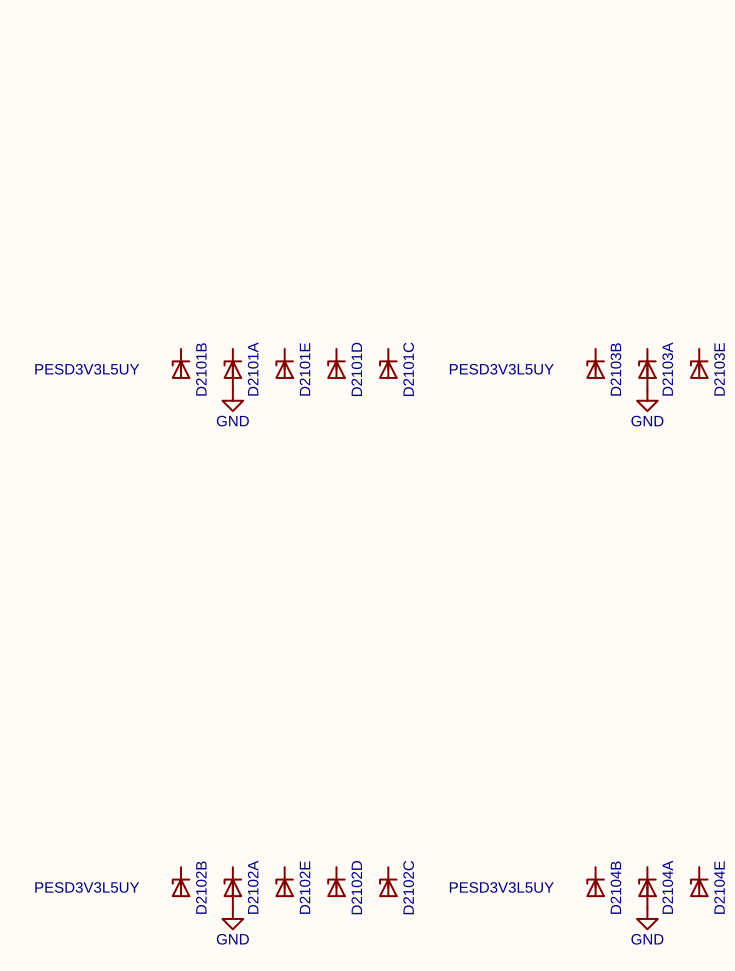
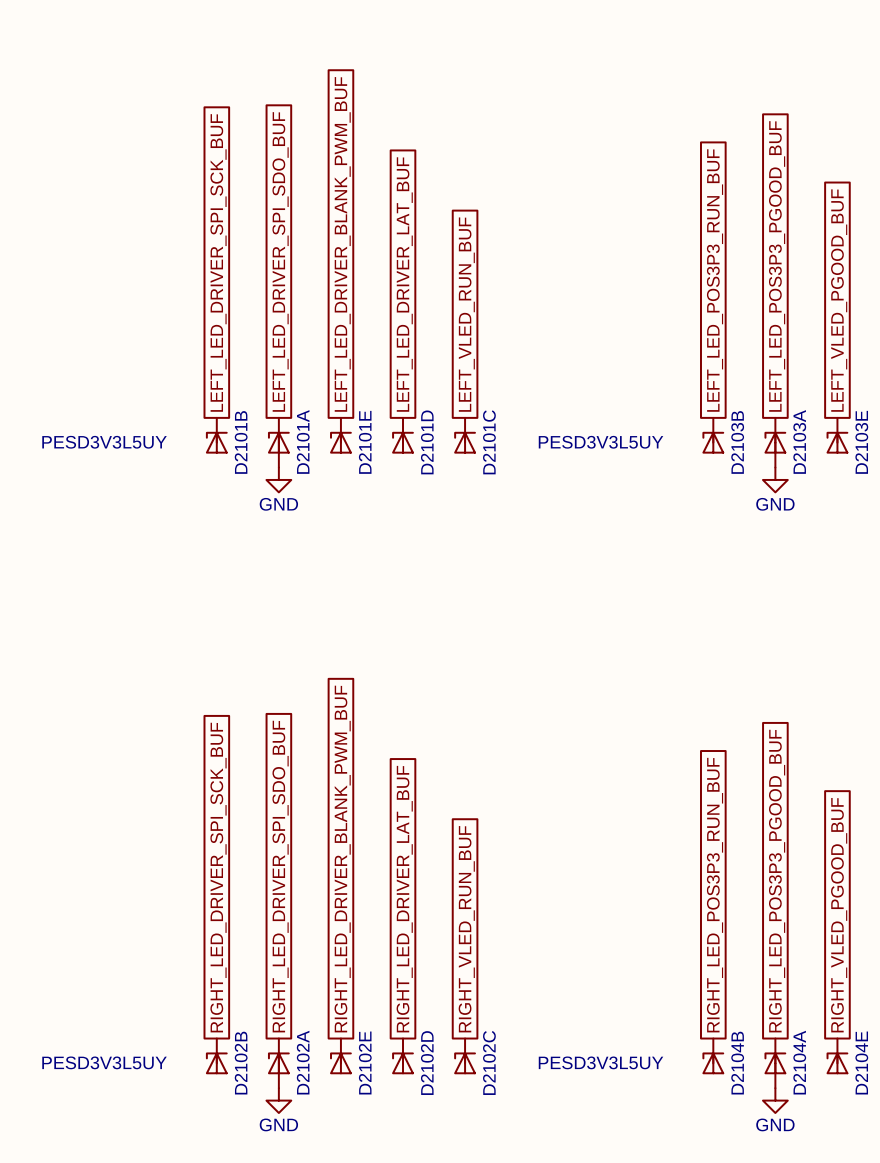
global label: none -> LEFT_LED_DRIVER_BLANK_PWM_BUF (342, 244)
global label: none -> LEFT_LED_DRIVER_SPI_SDO_BUF (280, 261)
global label: none -> LEFT_LED_DRIVER_SPI_SCK_BUF (218, 262)
global label: none -> LEFT_LED_POS3P3_PGOOD_BUF (777, 266)
global label: none -> LEFT_LED_POS3P3_RUN_BUF (715, 280)
global label: none -> LEFT_LED_DRIVER_LAT_BUF (404, 284)
global label: none -> LEFT_VLED_PGOOD_BUF (839, 300)
global label: none -> LEFT_VLED_RUN_BUF (466, 314)
global label: none -> RIGHT_LED_DRIVER_BLANK_PWM_BUF (342, 859)
global label: none -> RIGHT_LED_DRIVER_SPI_SDO_BUF (280, 876)
global label: none -> RIGHT_LED_DRIVER_SPI_SCK_BUF (218, 877)
global label: none -> RIGHT_LED_POS3P3_PGOOD_BUF (777, 881)
global label: none -> RIGHT_LED_POS3P3_RUN_BUF (715, 895)
global label: none -> RIGHT_LED_DRIVER_LAT_BUF (404, 899)
global label: none -> RIGHT_VLED_PGOOD_BUF (839, 915)
global label: none -> RIGHT_VLED_RUN_BUF (466, 929)

